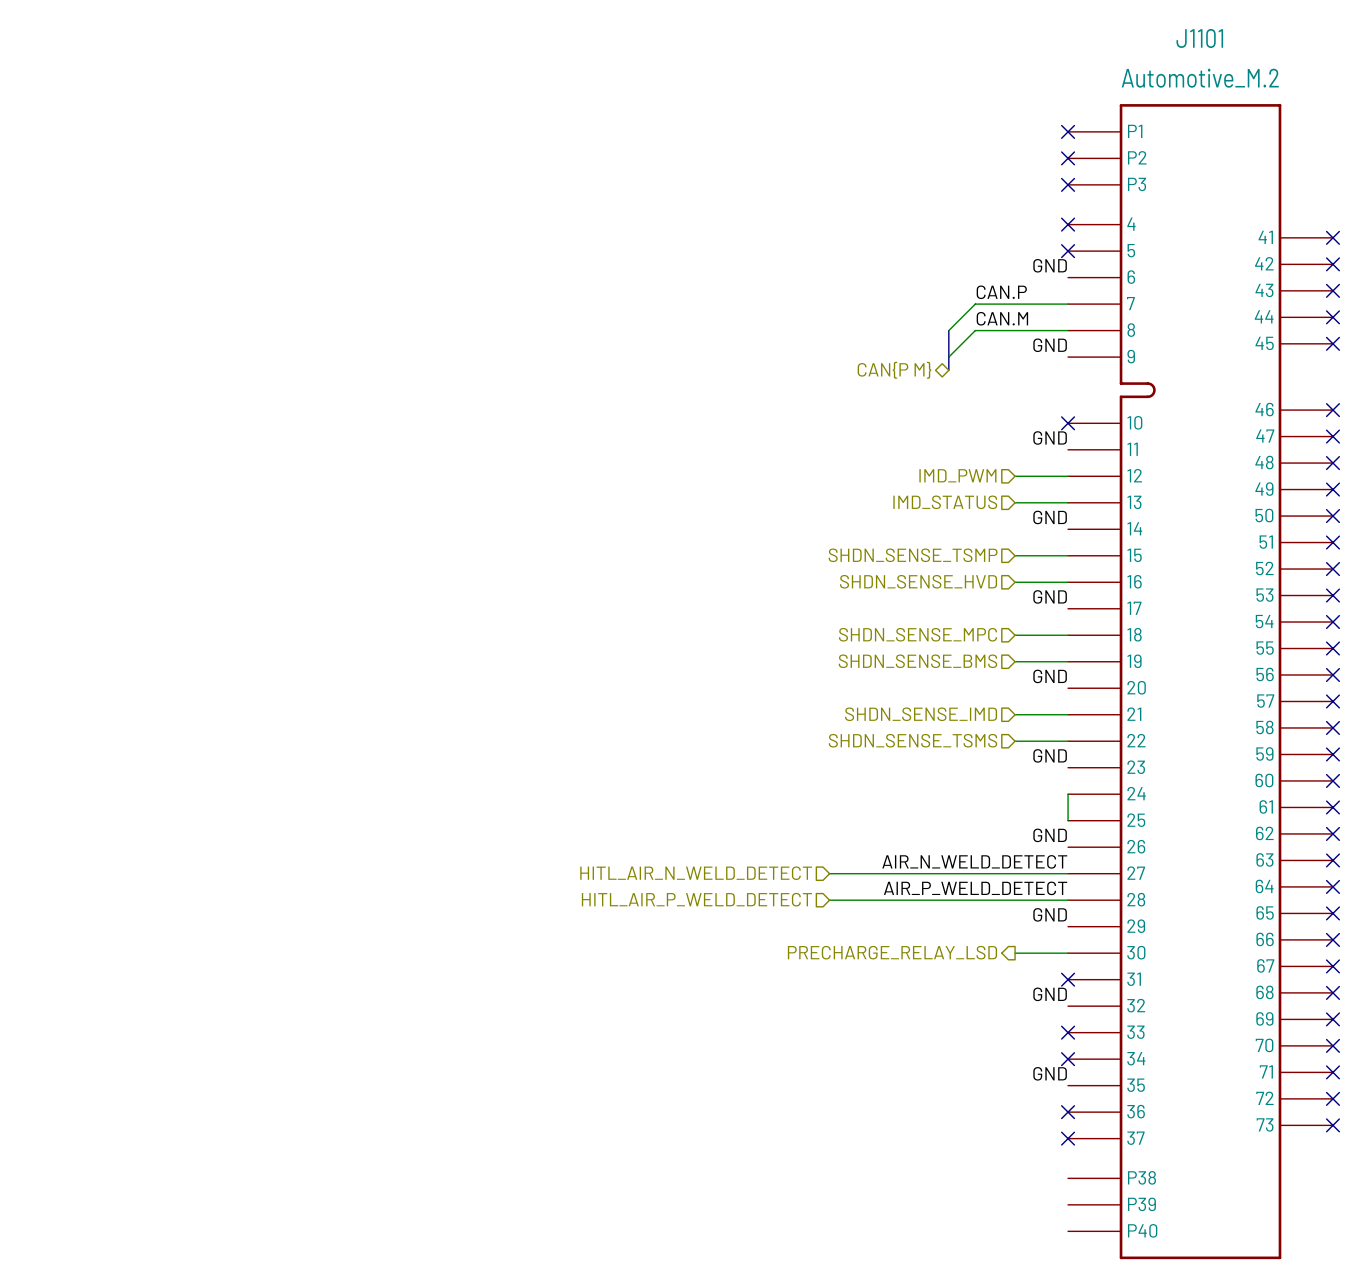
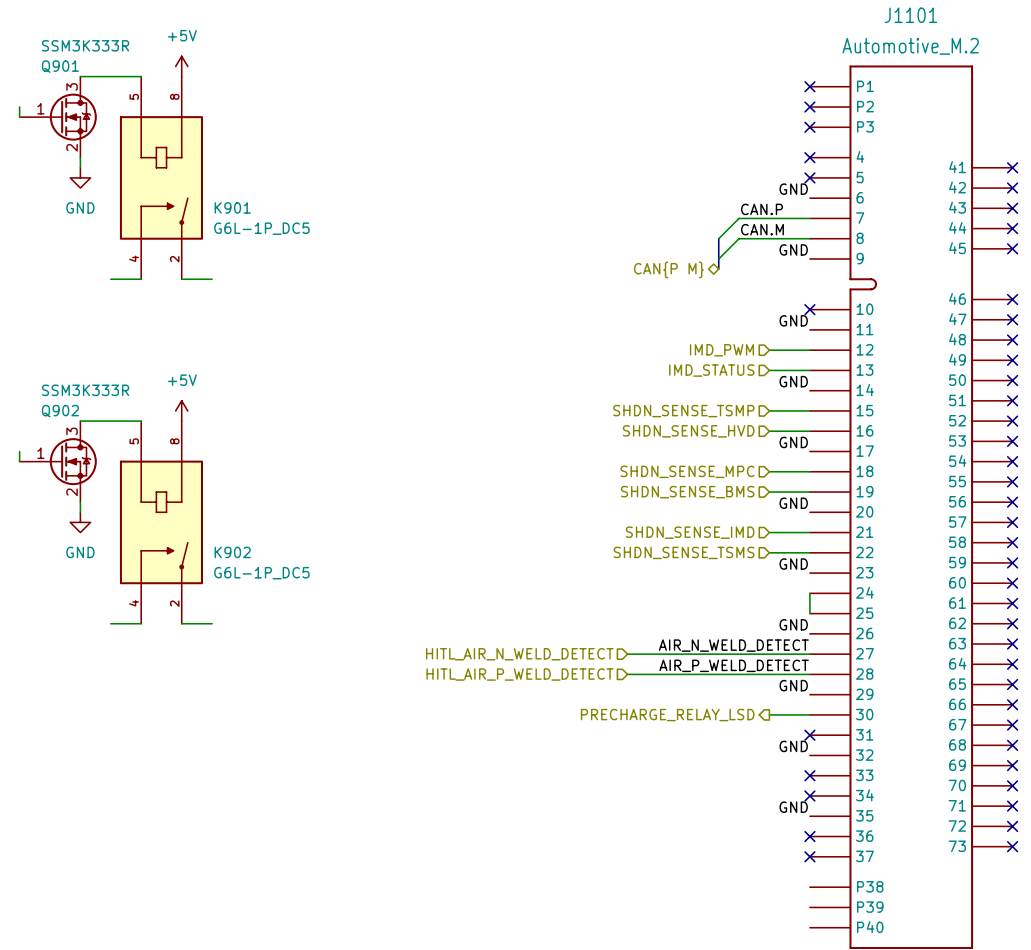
power symbol: none -> +5V (181, 66)
wire: none -> (80, 76) (141, 76)
wire: none -> (19, 106) (19, 117)
Q901: none -> SSM3K333R (58, 117)
wire: none -> (80, 157) (80, 167)
power symbol: none -> GND (80, 177)
K901: none -> G6L-1P_DC5 (161, 177)
wire: none -> (110, 279) (141, 279)
wire: none -> (181, 279) (212, 279)
power symbol: none -> +5V (181, 410)
wire: none -> (80, 421) (141, 421)
wire: none -> (19, 451) (19, 461)
Q902: none -> SSM3K333R (58, 461)
wire: none -> (80, 502) (80, 512)
power symbol: none -> GND (80, 522)
K902: none -> G6L-1P_DC5 (161, 522)
wire: none -> (110, 623) (141, 623)
wire: none -> (181, 623) (212, 623)

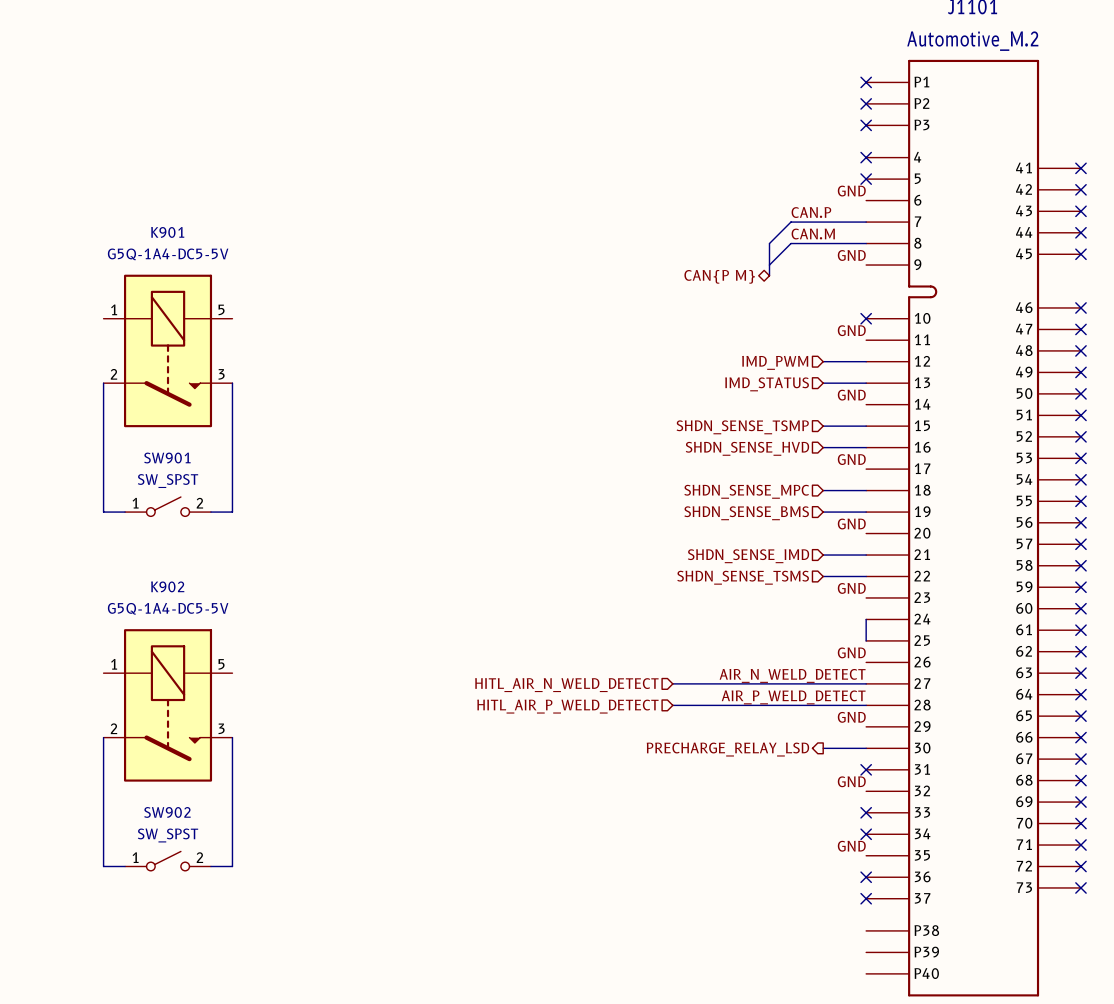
power symbol: +5V (181, 66) -> none
wire: (80, 76) (141, 76) -> none
K901 symbol: [119, 76, 204, 280] -> [103, 274, 233, 428]
wire: (19, 106) (19, 117) -> none
Q901: SSM3K333R (58, 117) -> none
wire: (80, 157) (80, 167) -> none
power symbol: GND (80, 177) -> none
K901 name position: K901 (232, 207) -> K901 (167, 232)
K901 value: G6L-1P_DC5 (261, 228) -> G5Q-1A4-DC5-5V (168, 254)
wire: (181, 279) (212, 279) -> none
wire: none -> (103, 383) (103, 512) (125, 512)
wire: none -> (232, 383) (232, 512) (210, 512)
power symbol: +5V (181, 410) -> none
wire: (80, 421) (141, 421) -> none
K902 symbol: [119, 421, 204, 624] -> [103, 629, 233, 782]
wire: (19, 451) (19, 461) -> none
Q902: SSM3K333R (58, 461) -> none
SW901: none -> SW_SPST (168, 506)
wire: (80, 502) (80, 512) -> none
power symbol: GND (80, 522) -> none
K902 name position: K902 (232, 552) -> K902 (167, 586)
K902 value: G6L-1P_DC5 (261, 573) -> G5Q-1A4-DC5-5V (168, 608)
wire: (181, 623) (212, 623) -> none
wire: none -> (103, 737) (103, 866) (125, 866)
wire: none -> (232, 737) (232, 866) (210, 866)
SW902: none -> SW_SPST (168, 861)

